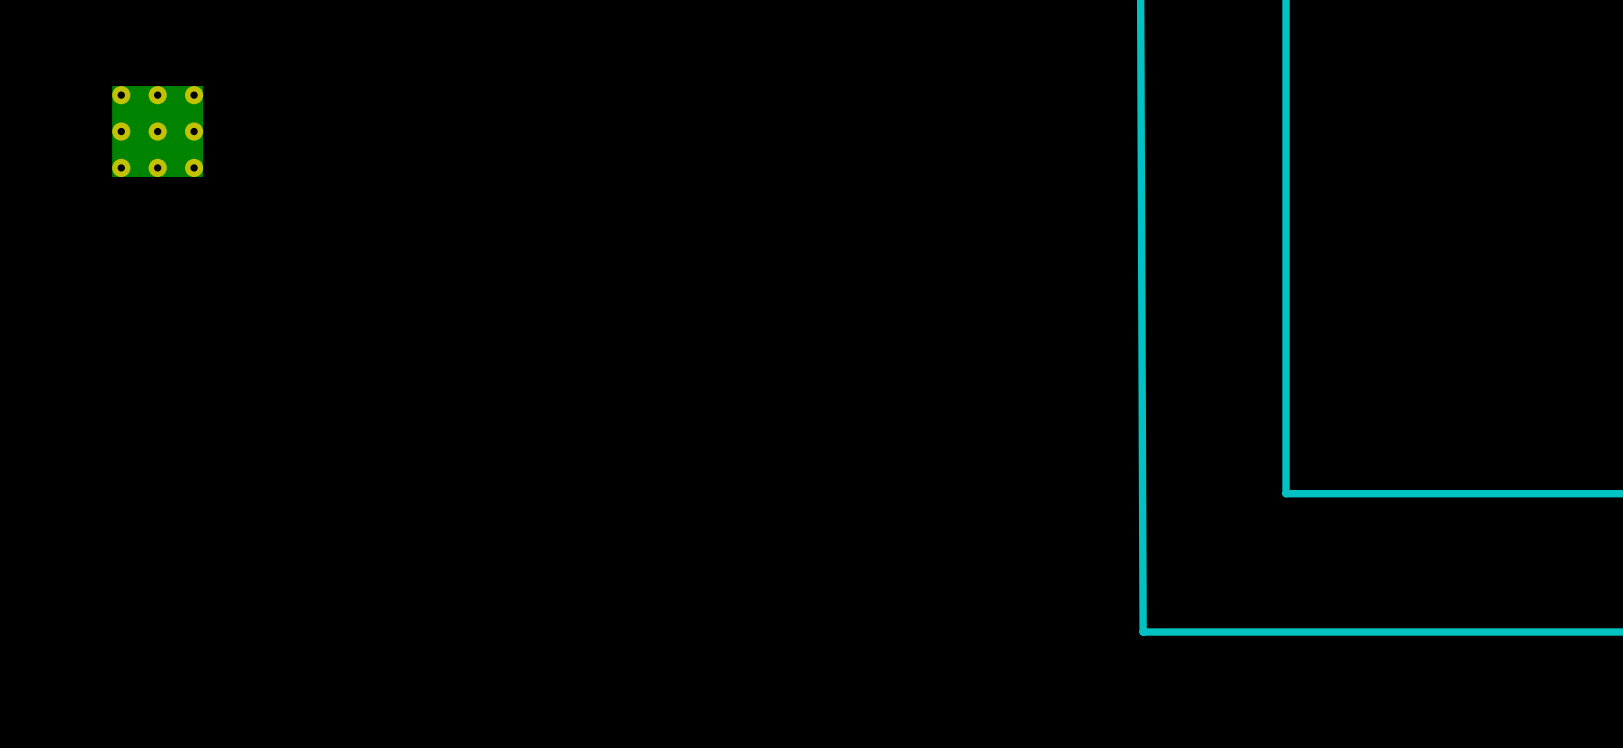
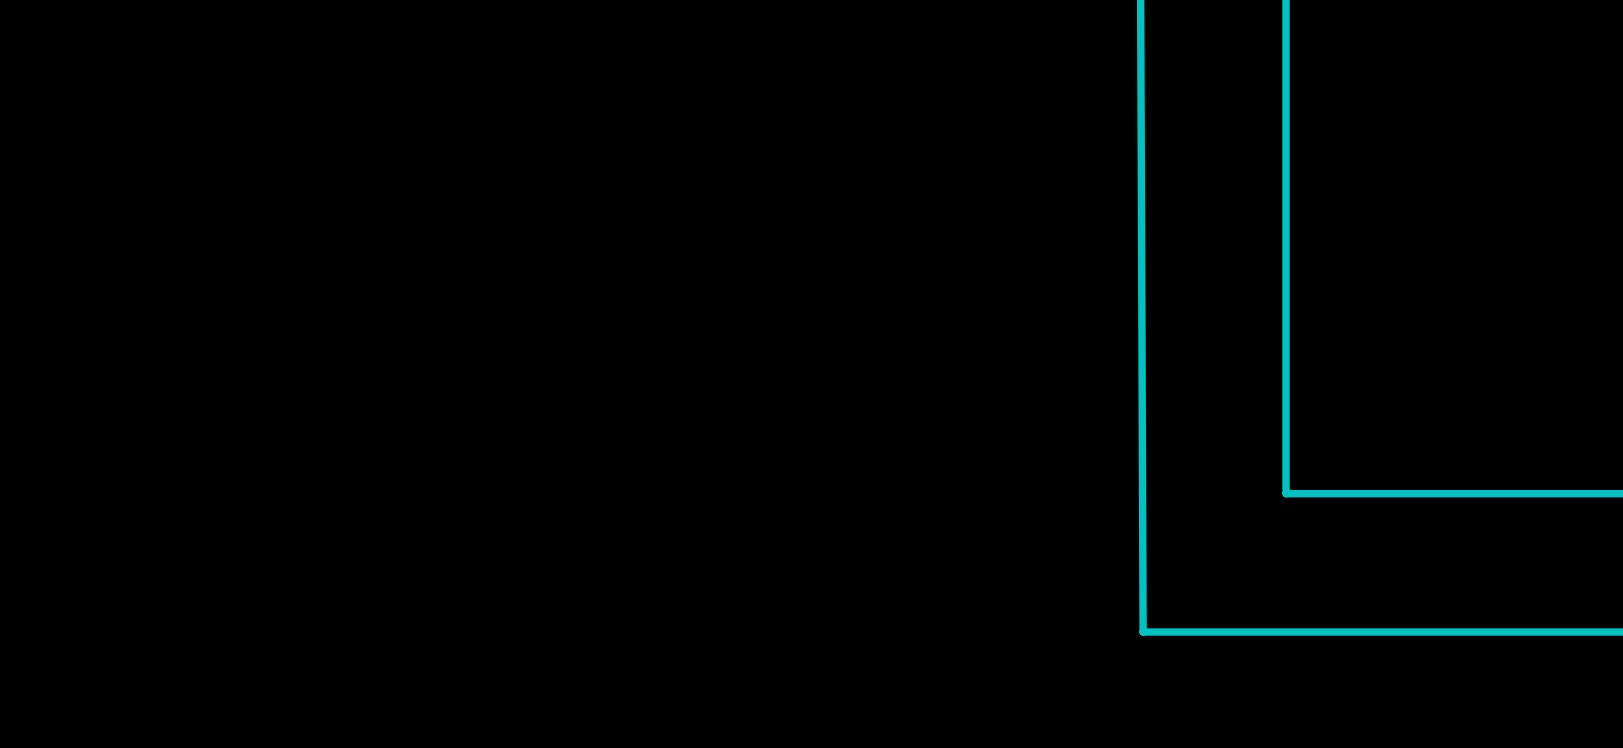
part: (157, 131) -> none

